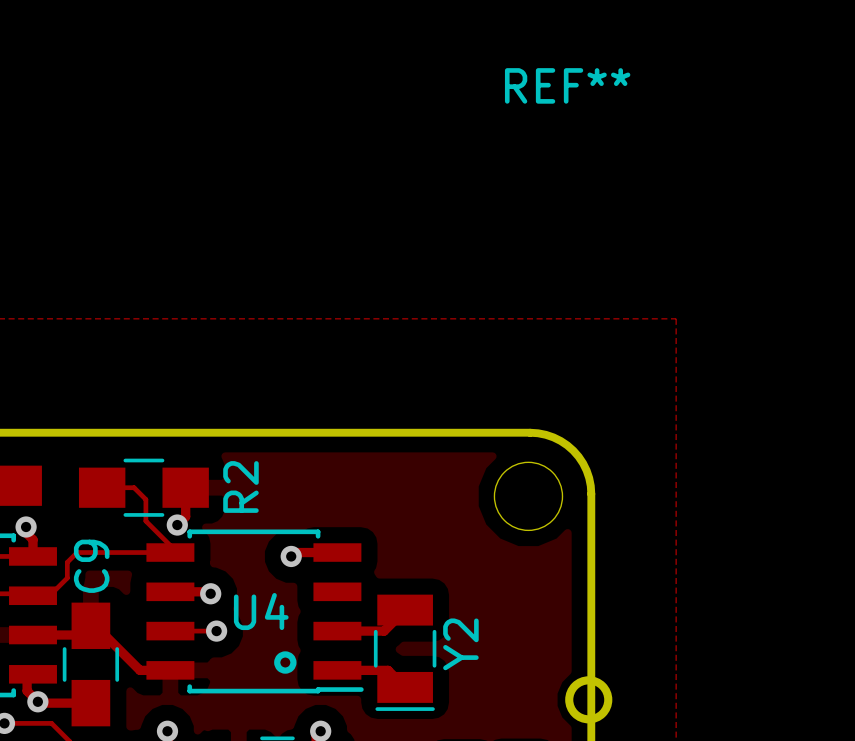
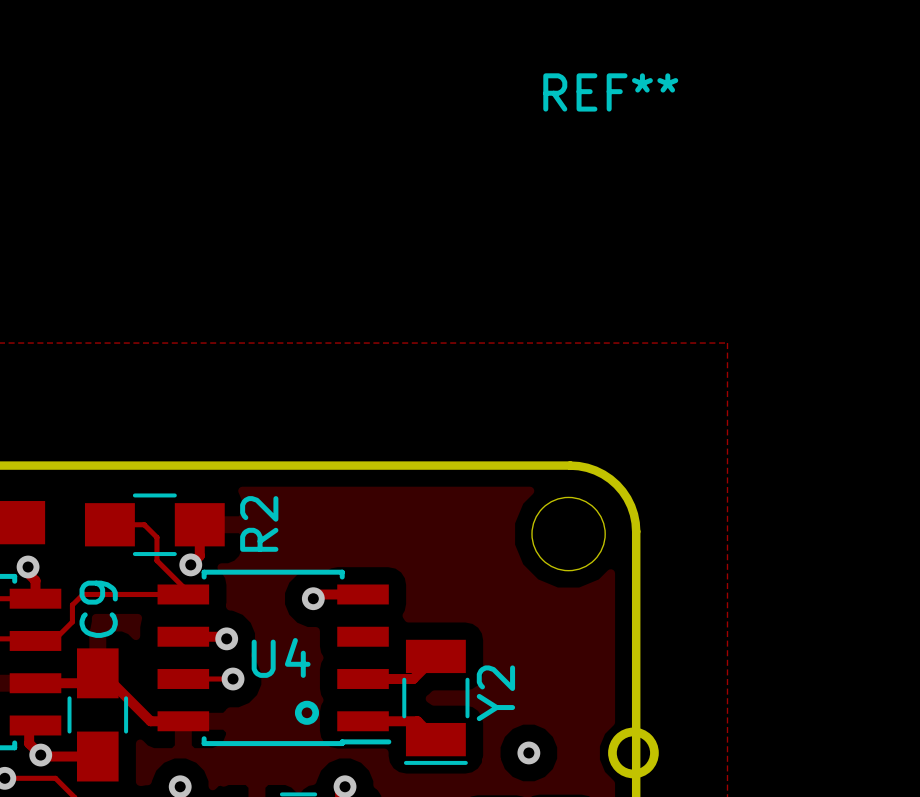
via: none -> (528, 752)

